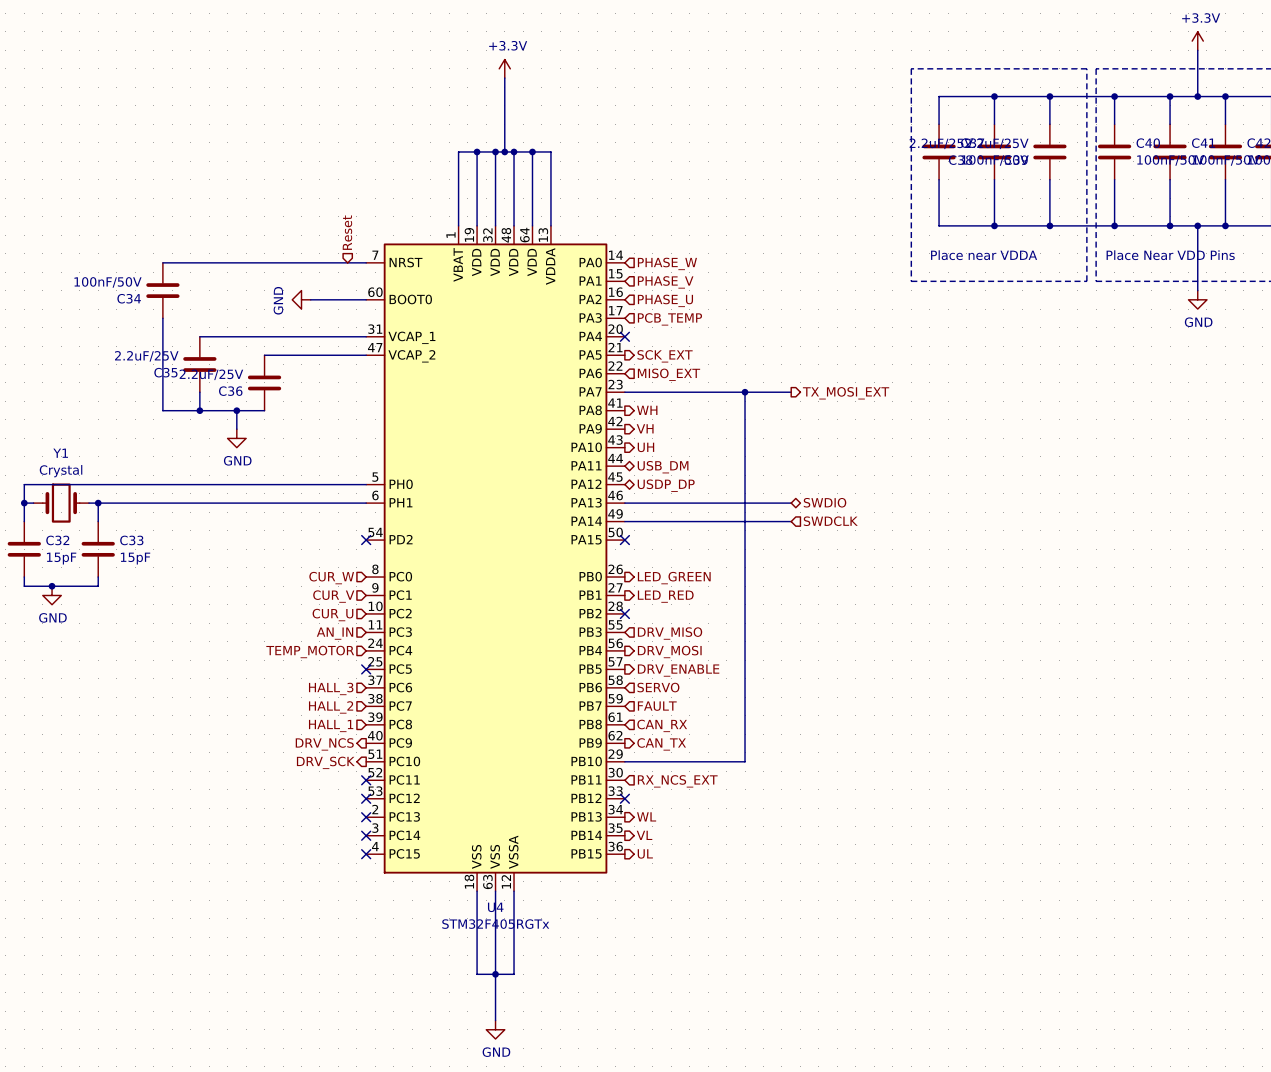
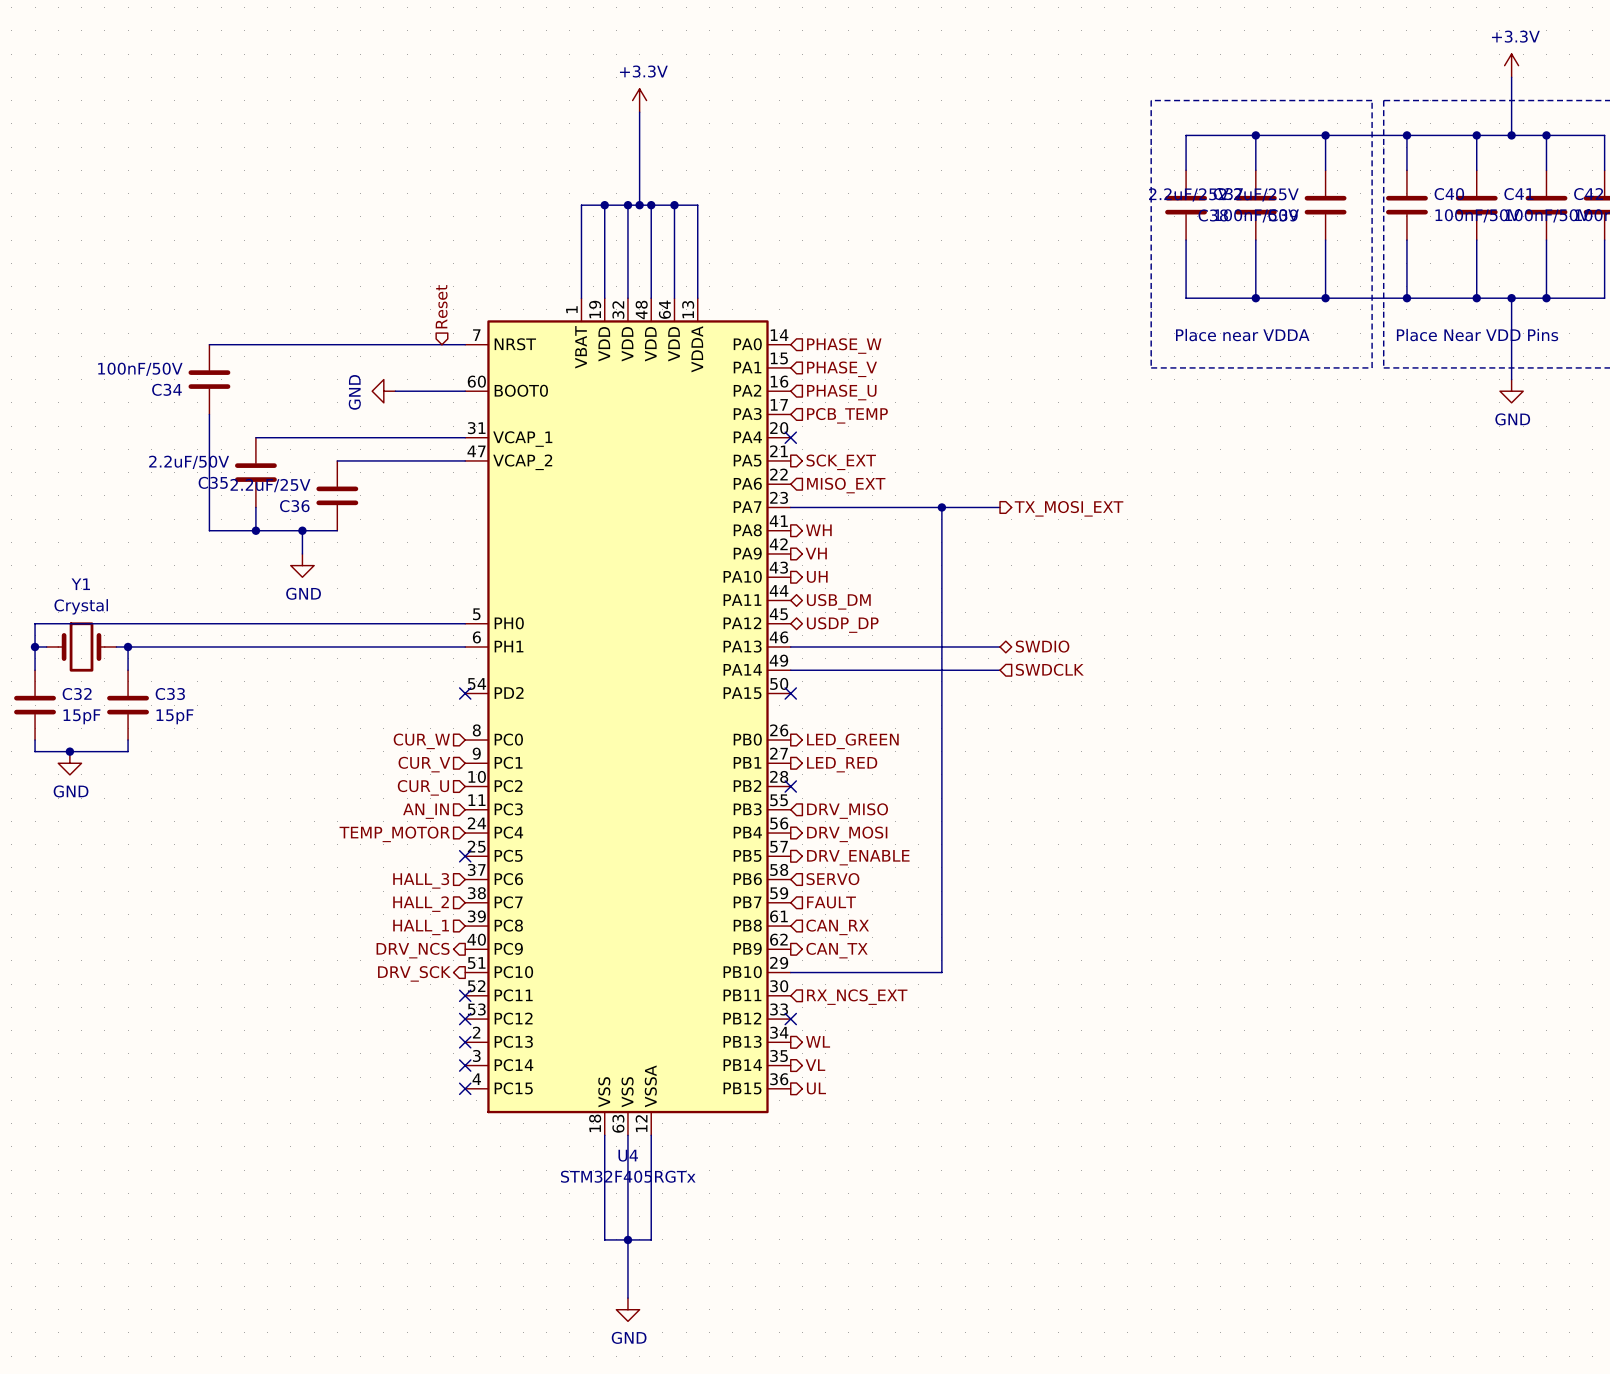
C35 value: 2.2uF/25V (146, 356) -> 2.2uF/50V (189, 462)

